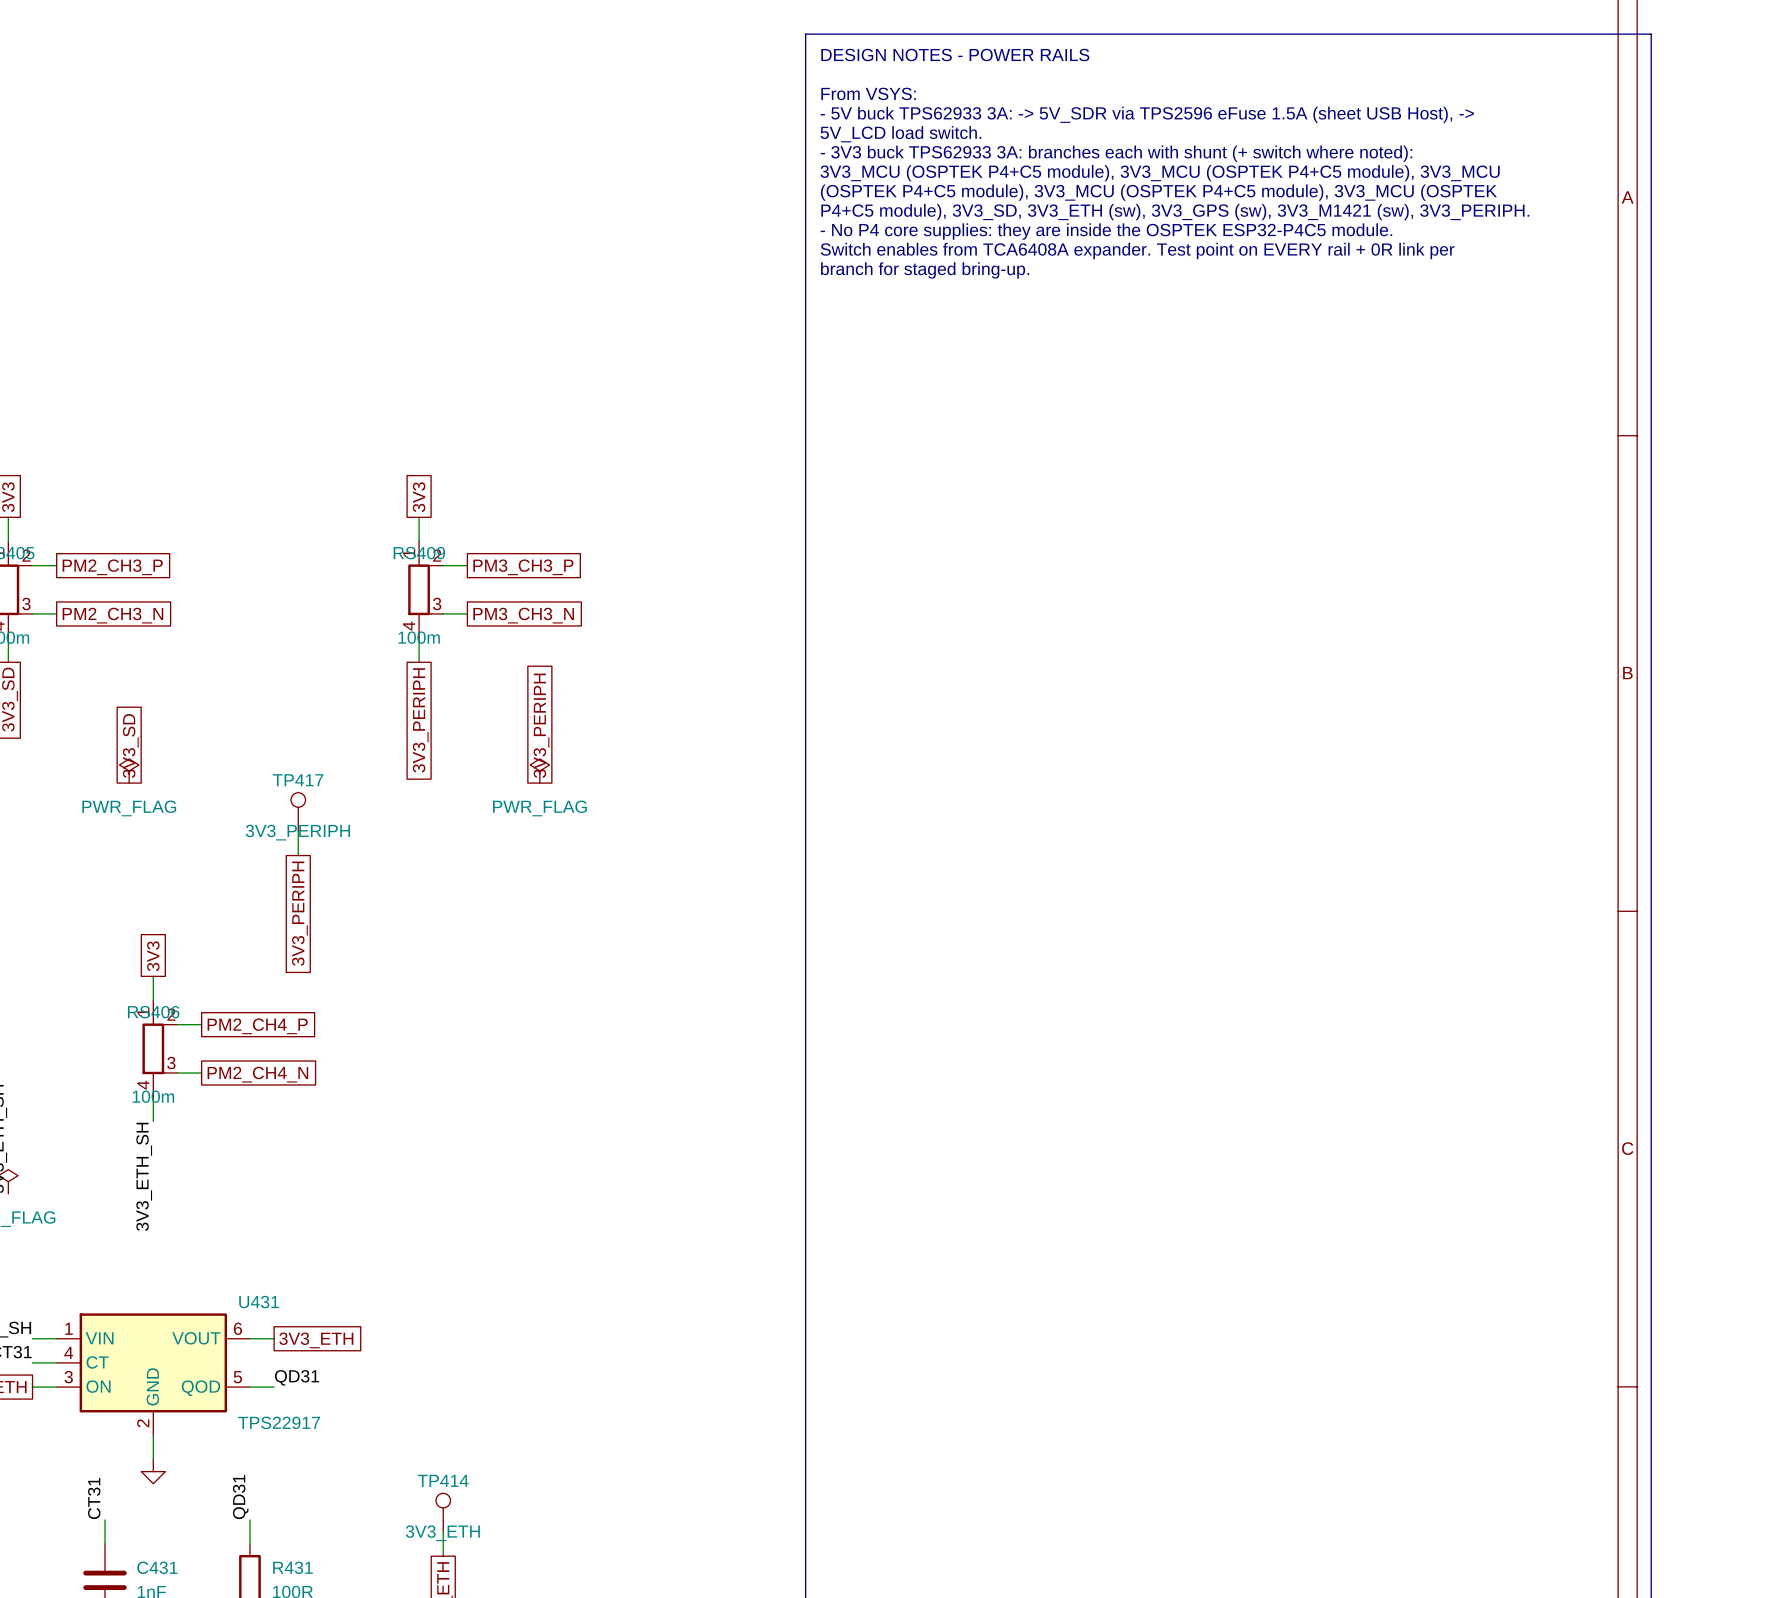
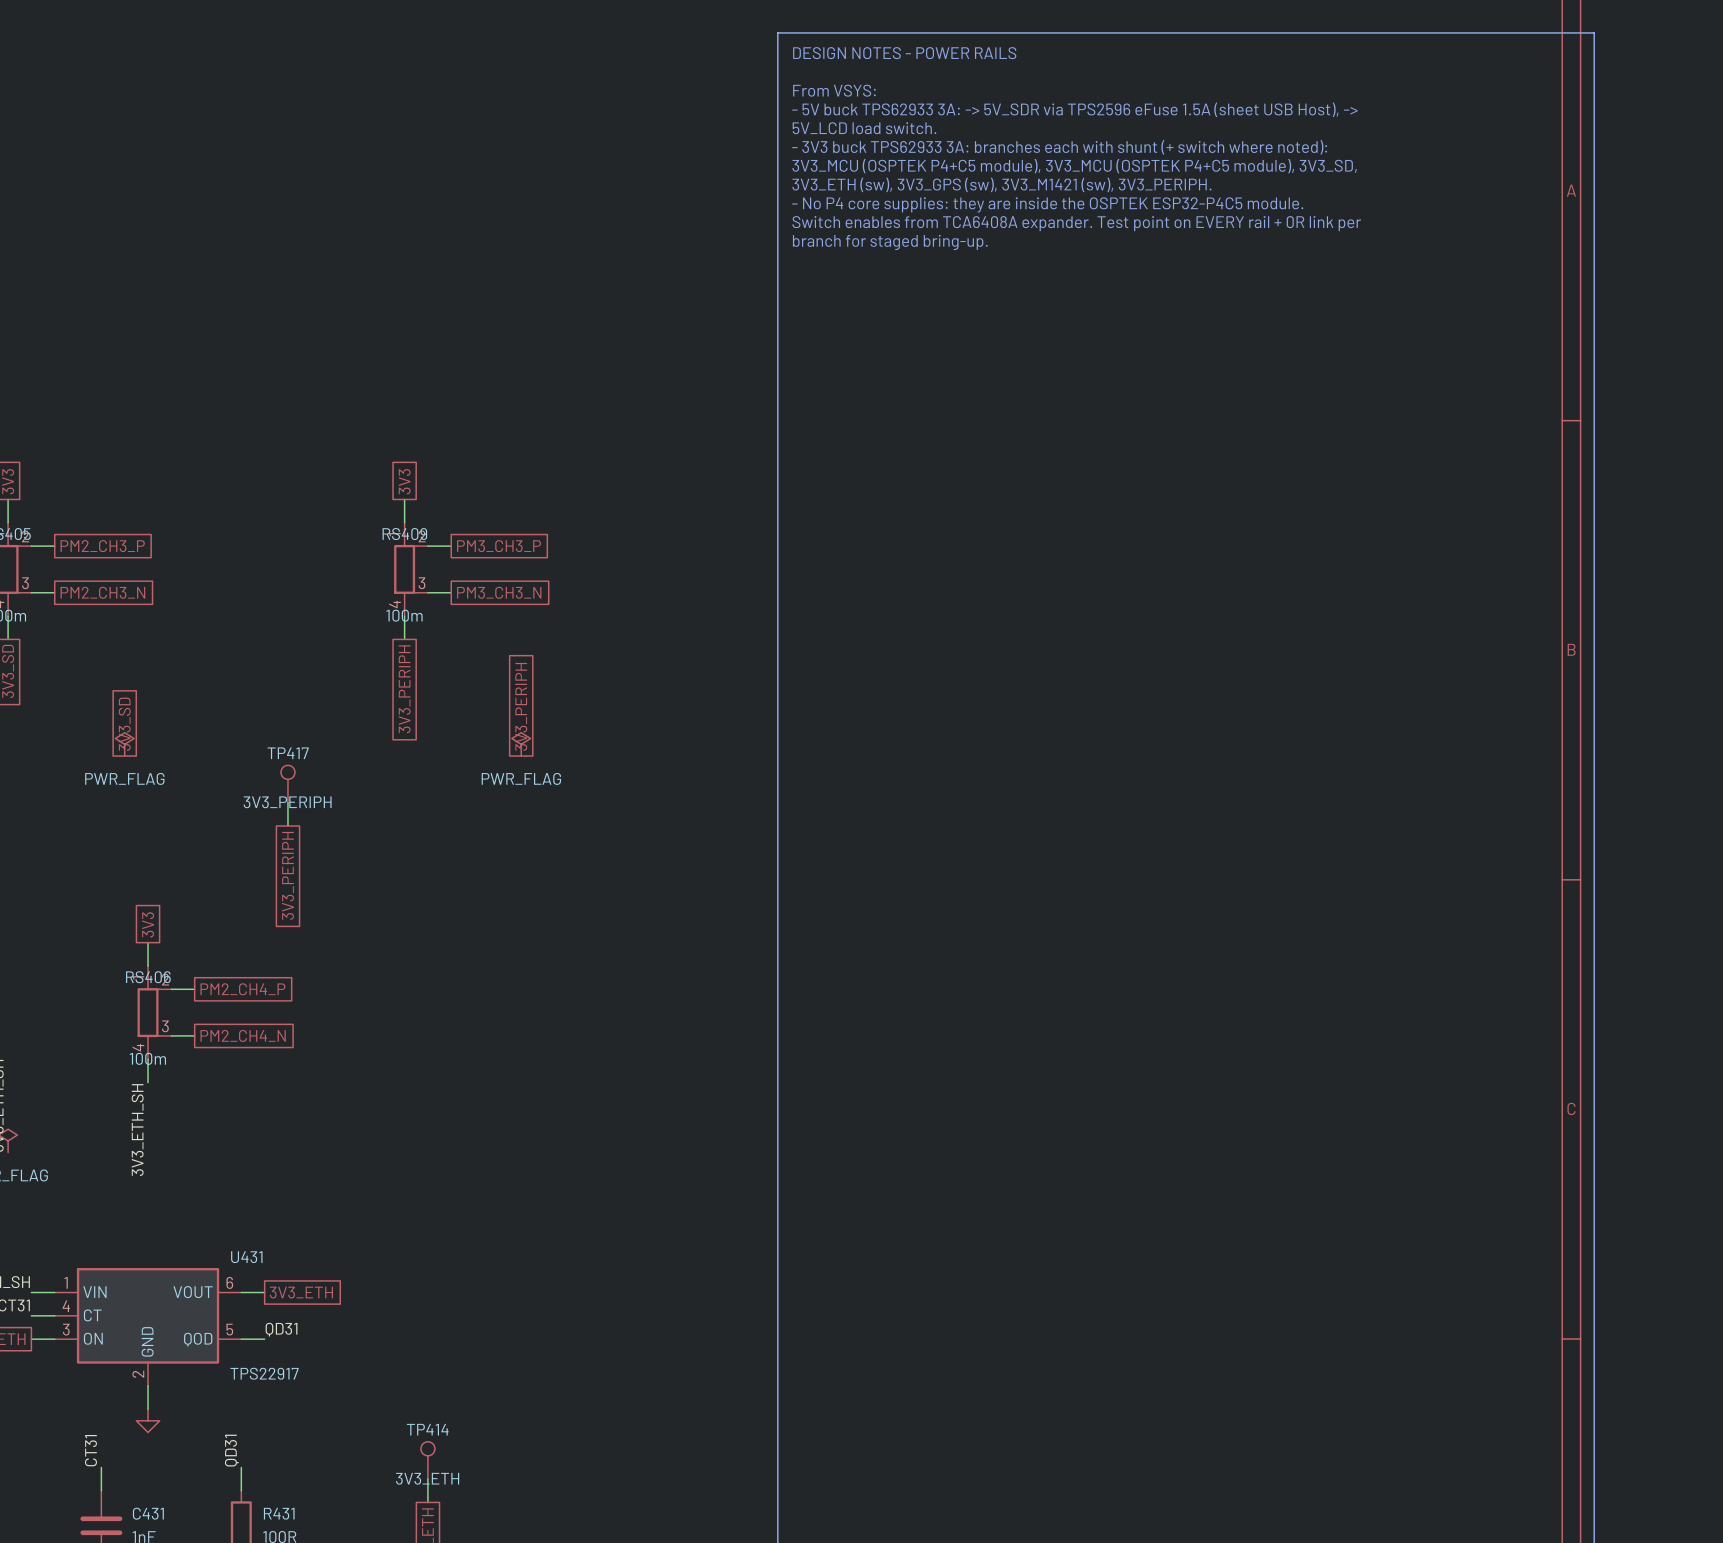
text: 3V3_MCU (OSPTEK P4+C5 module), 3V3_MCU (OSPTEK P4+C5 module), 3V3_MCU (1160, 173) -> 3V3_MCU (OSPTEK P4+C5 module), 3V3_MCU (OSPTEK P4+C5 module), 3V3_SD, (1074, 166)
text: (OSPTEK P4+C5 module), 3V3_MCU (OSPTEK P4+C5 module), 3V3_MCU (OSPTEK (1158, 192) -> 3V3_ETH (sw), 3V3_GPS (sw), 3V3_M1421 (sw), 3V3_PERIPH. (1001, 184)
text: P4+C5 module), 3V3_SD, 3V3_ETH (sw), 3V3_GPS (sw), 3V3_M1421 (sw), 3V3_PERIPH. (1175, 212) -> - No P4 core supplies: they are inside the OSPTEK ESP32-P4C5 module. (1047, 204)
text: - No P4 core supplies: they are inside the OSPTEK ESP32-P4C5 module. (1106, 231) -> Switch enables from TCA6408A expander. Test point on EVERY rail + 0R link per (1076, 223)
text: Switch enables from TCA6408A expander. Test point on EVERY rail + 0R link per (1137, 251) -> branch for staged bring-up. (890, 242)
text: branch for staged bring-up. (925, 270) -> none

